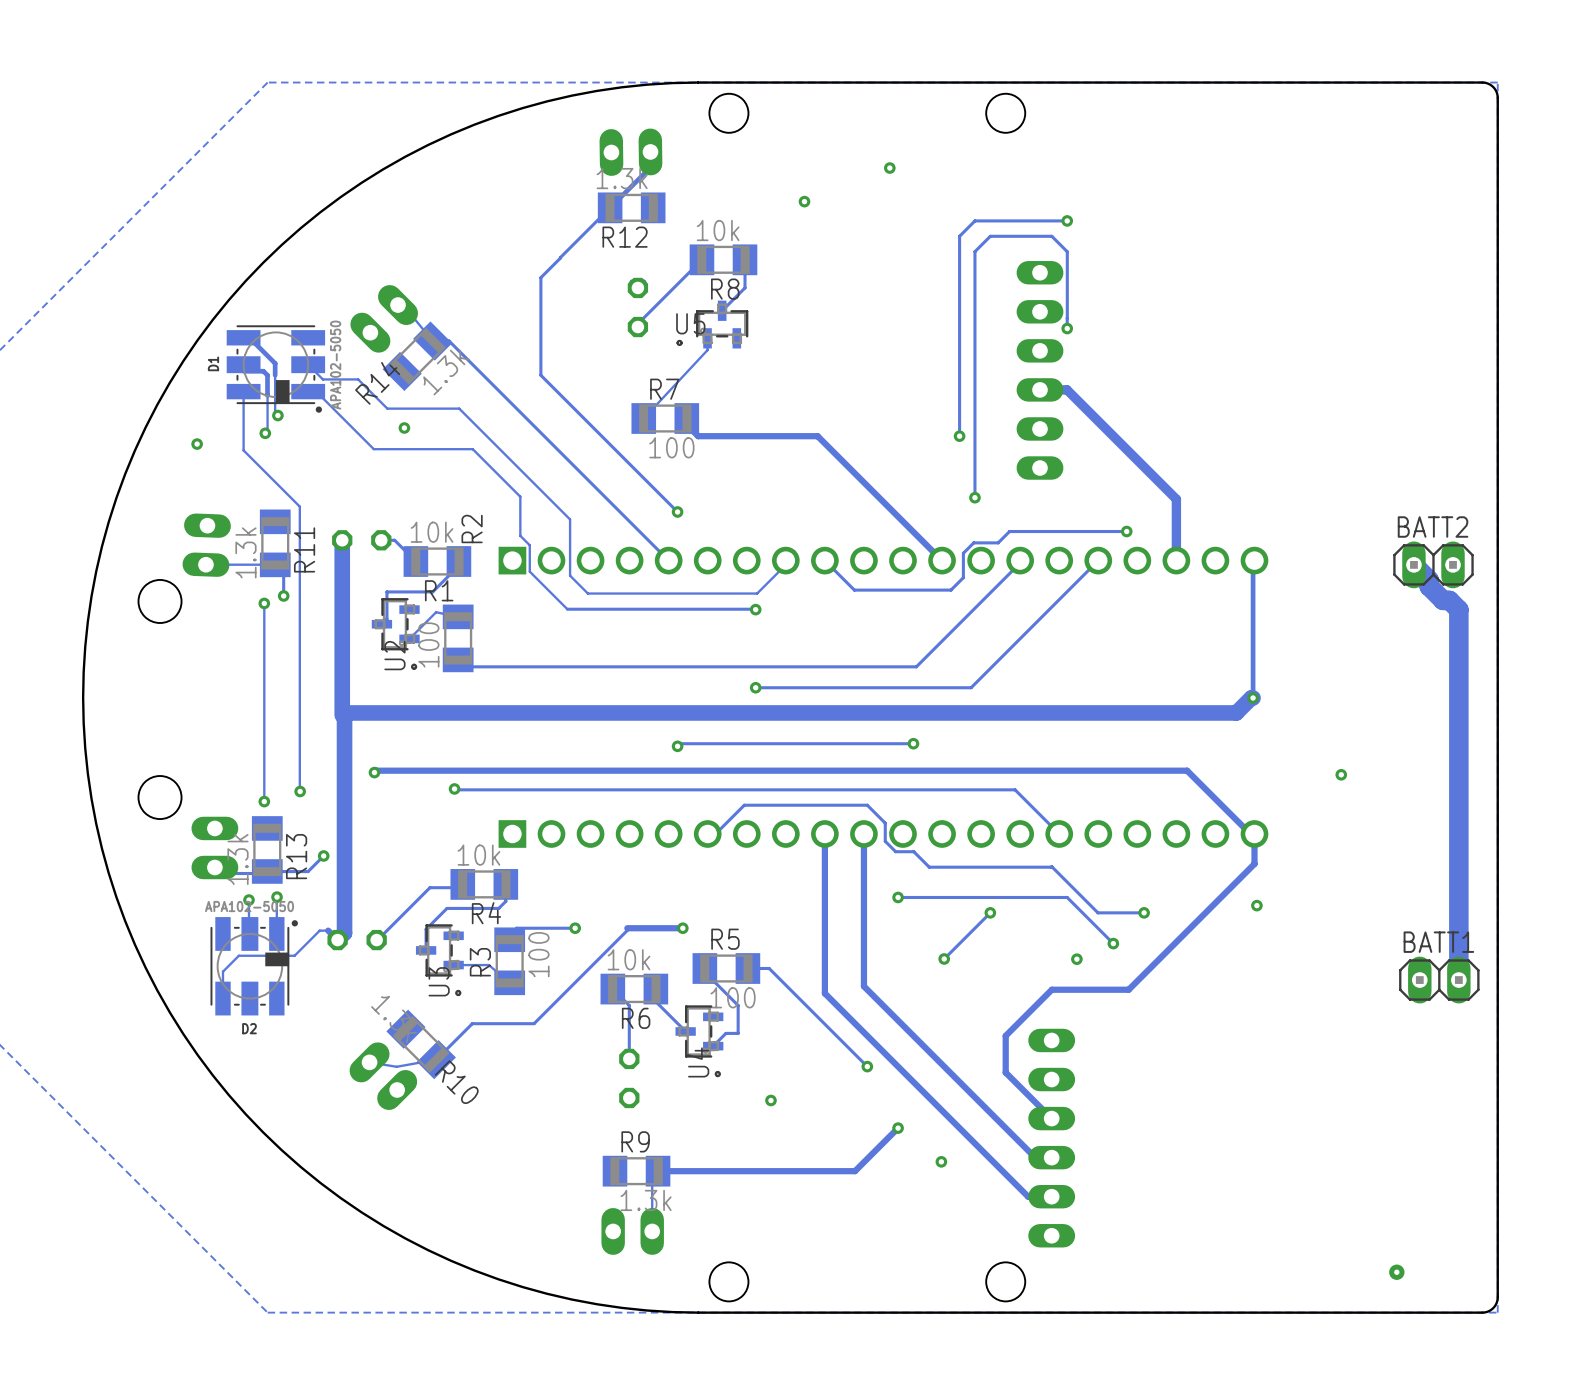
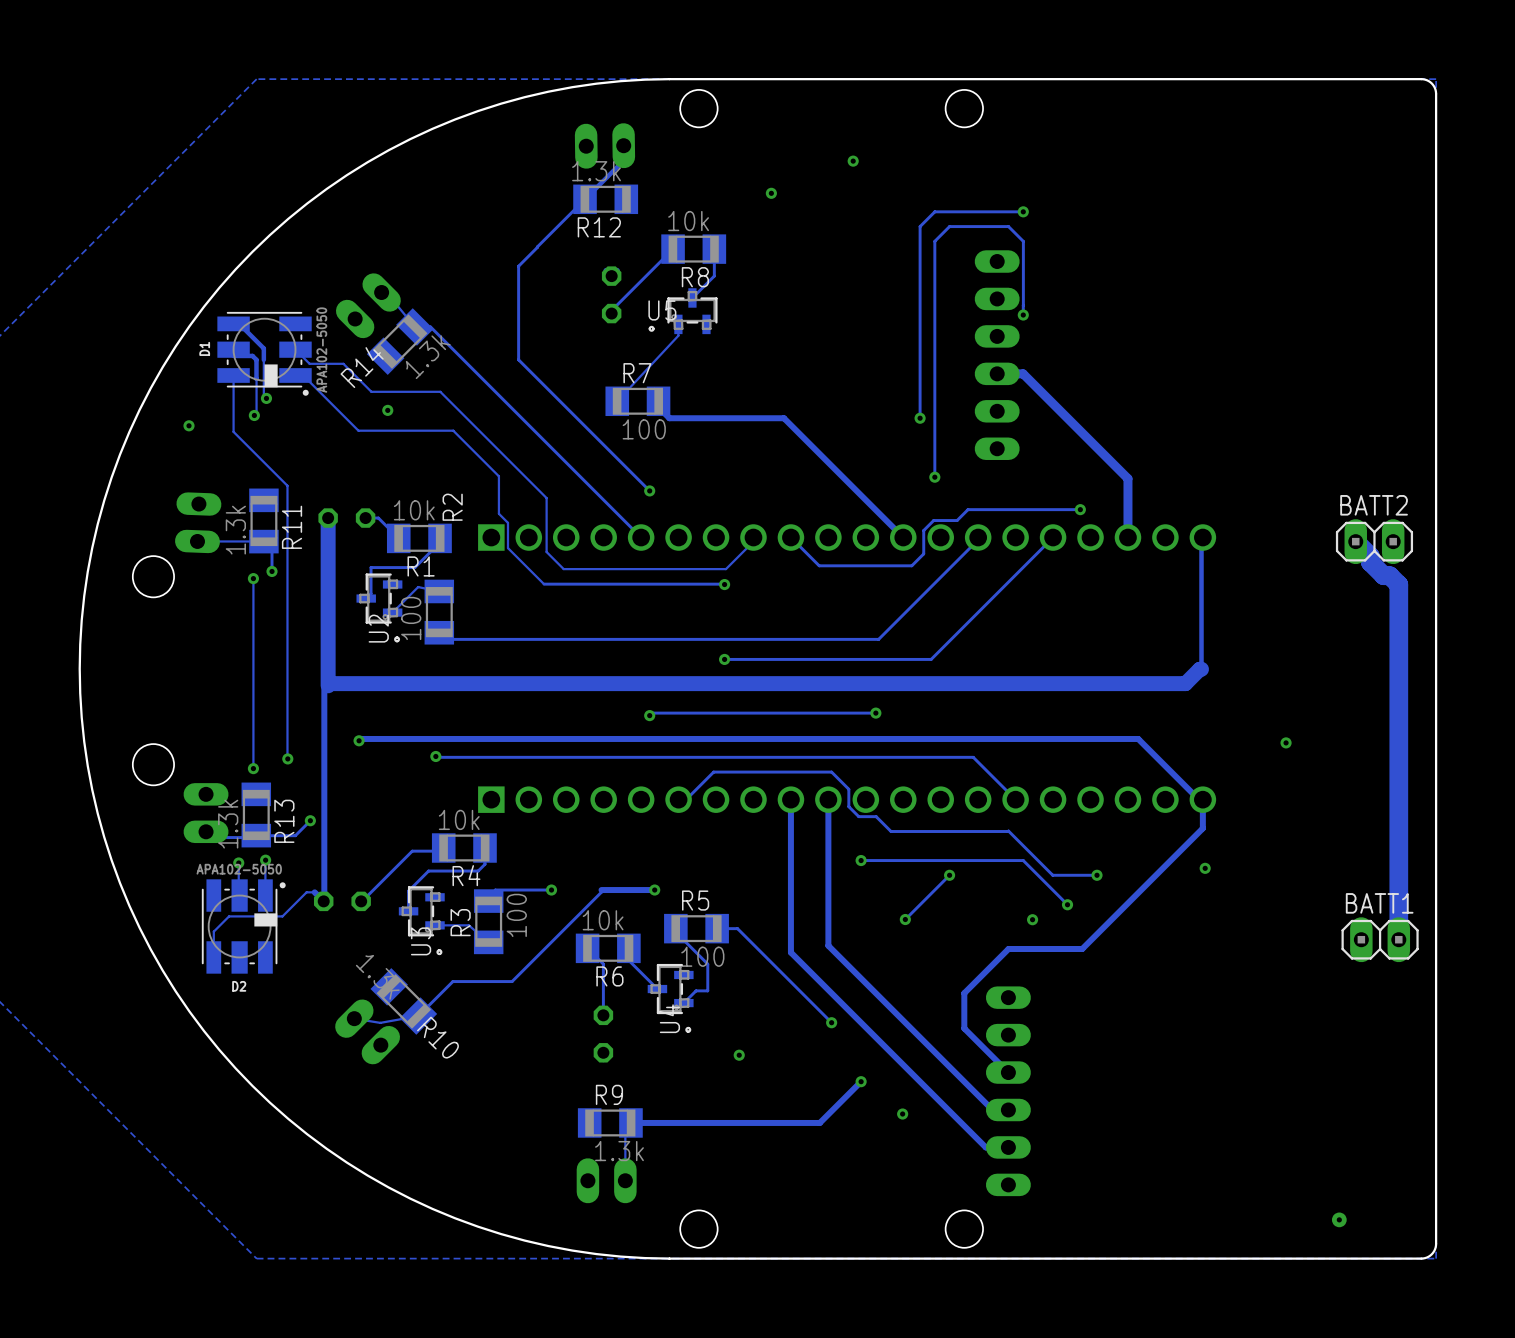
via: (1253, 698) -> none
track: (344, 712) (344, 933) (337, 940) -> none
track: none -> (324, 689) (324, 900)

